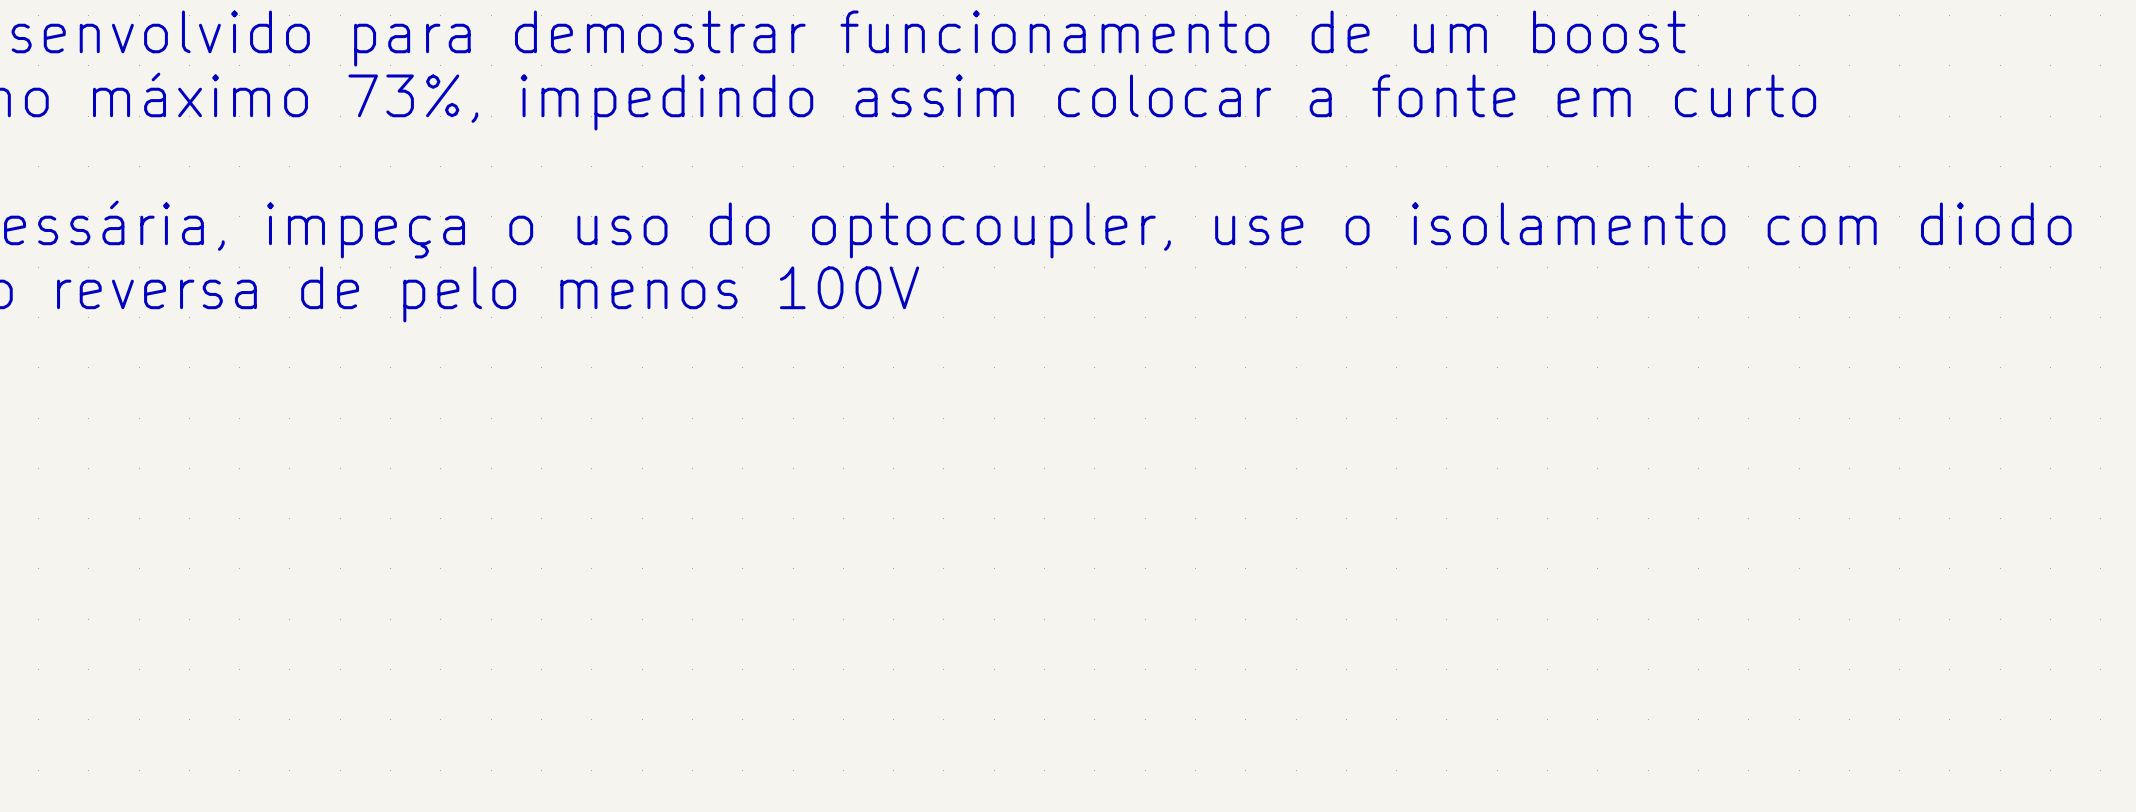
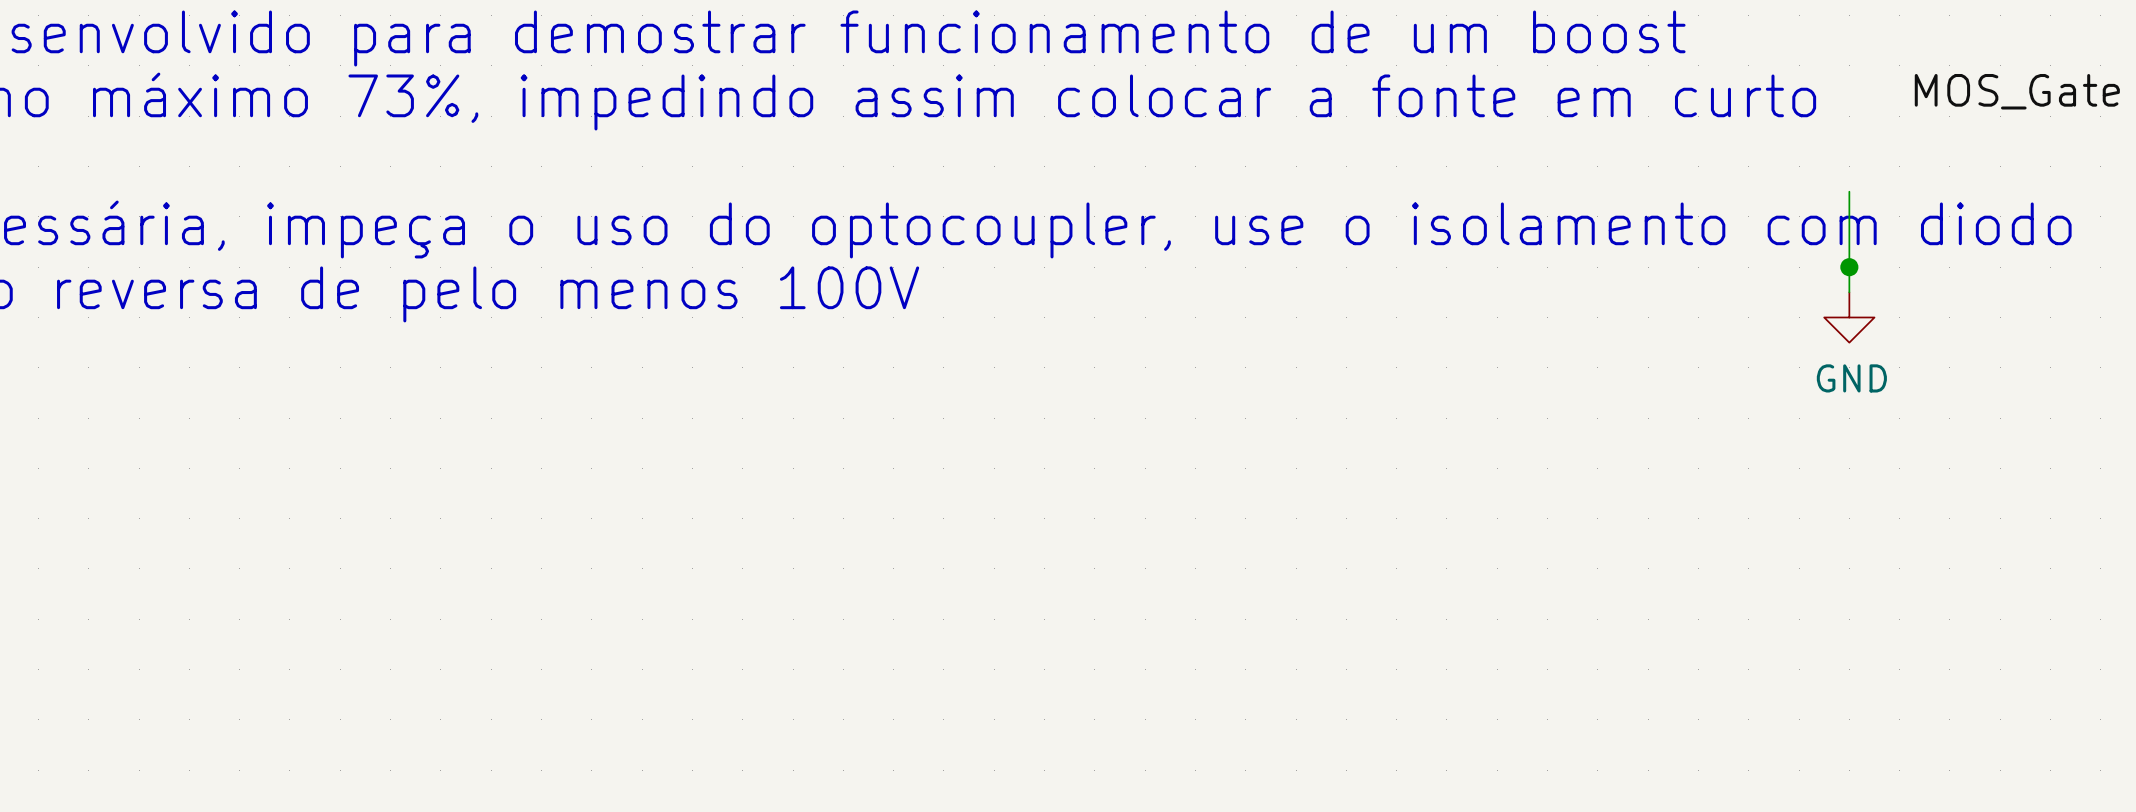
label: none -> MOS_Gate (2017, 91)
wire: none -> (1849, 191) (1849, 292)
junction: none -> (1849, 267)
power symbol: none -> GND (1849, 317)

